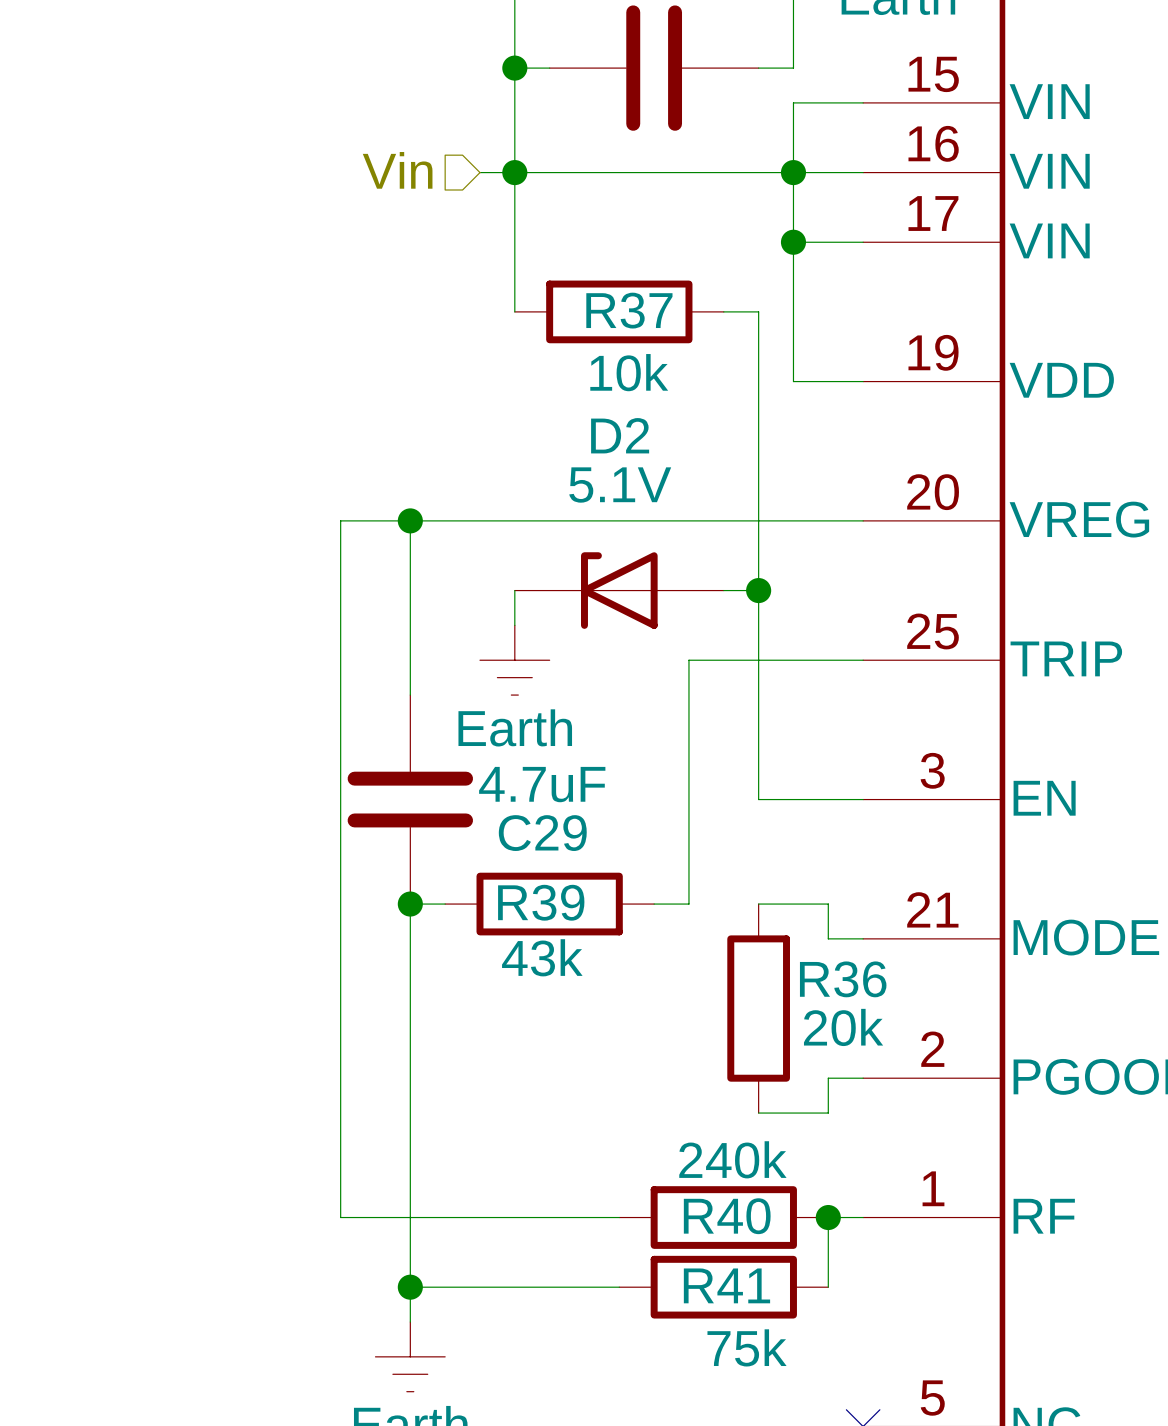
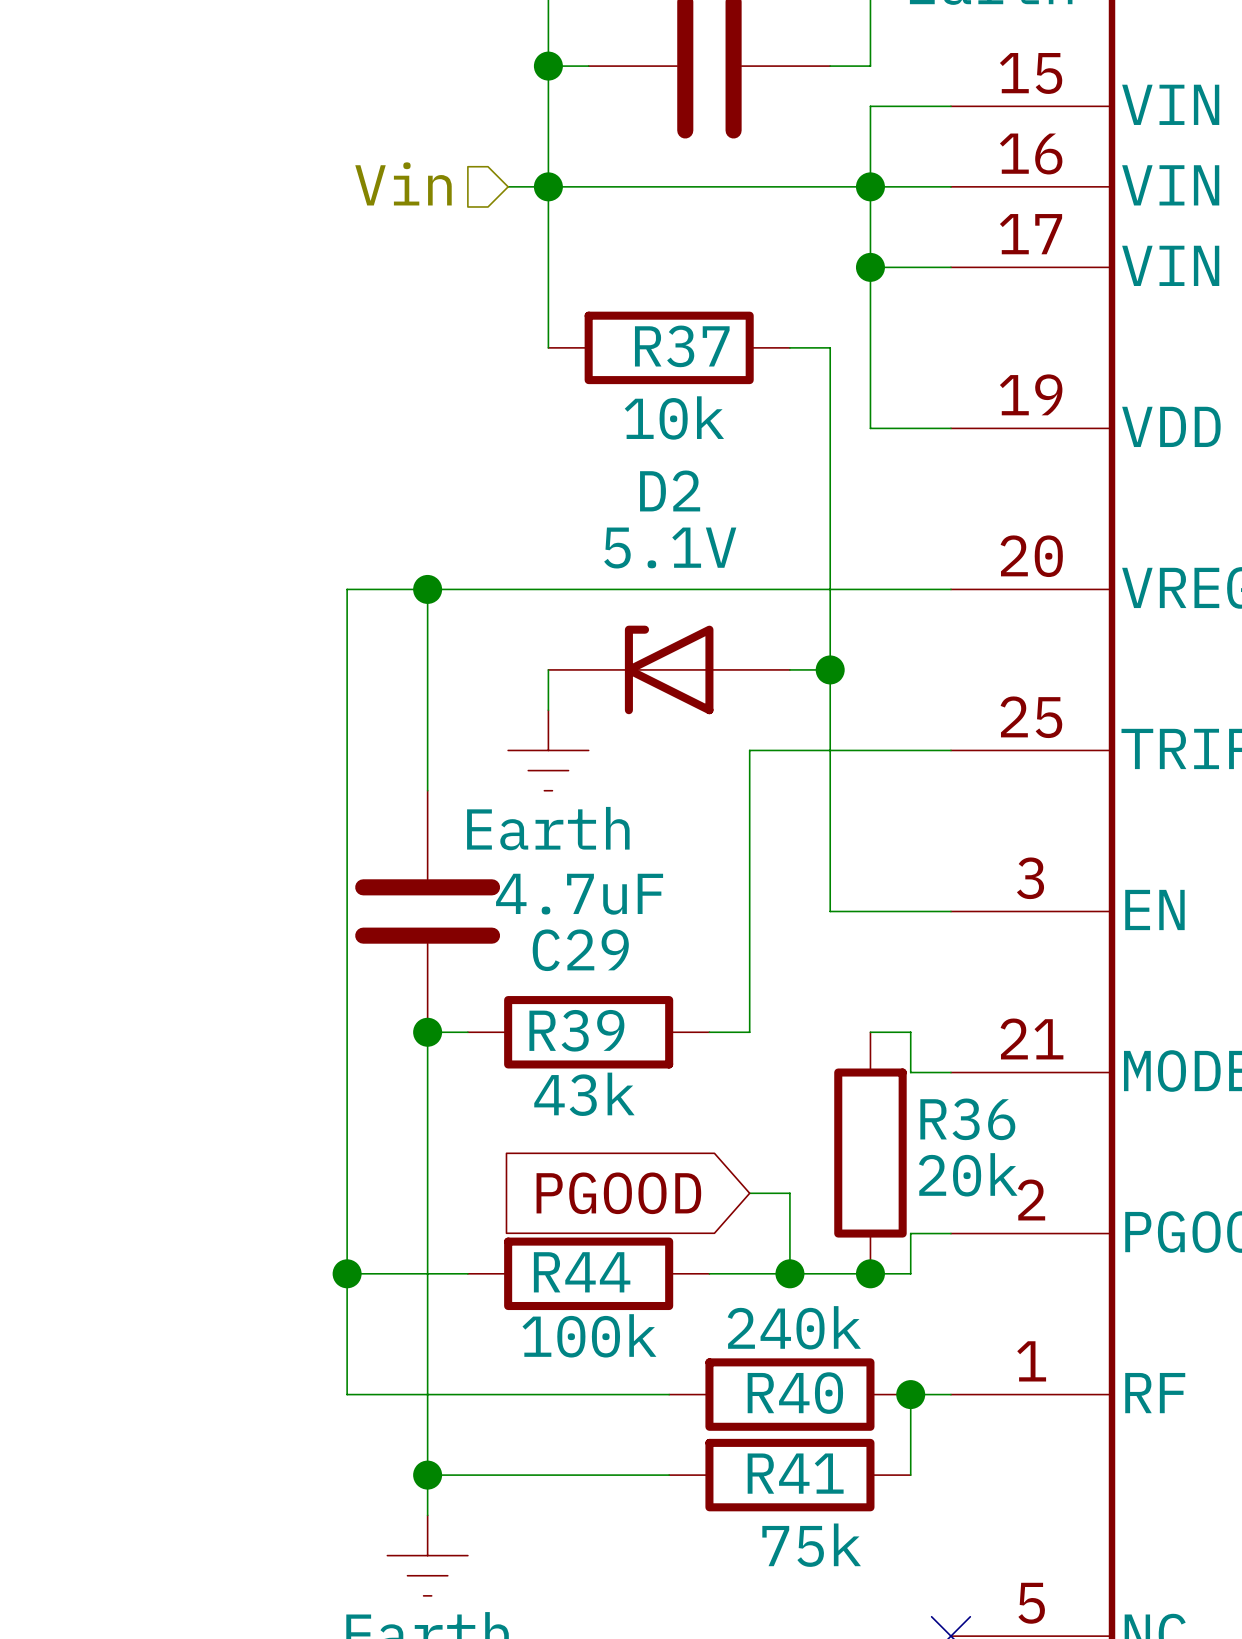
wire: (758, 904) (793, 904) -> none
R36 position: (758, 1008) -> (870, 1153)
global label: none -> PGOOD (618, 1193)
wire: none -> (749, 1193) (789, 1193) (789, 1273)
wire: none -> (347, 1273) (467, 1273)
junction: none -> (347, 1273)
R44: none -> 100k (588, 1273)
wire: none -> (709, 1273) (830, 1273)
junction: none -> (789, 1273)
junction: none -> (870, 1273)

